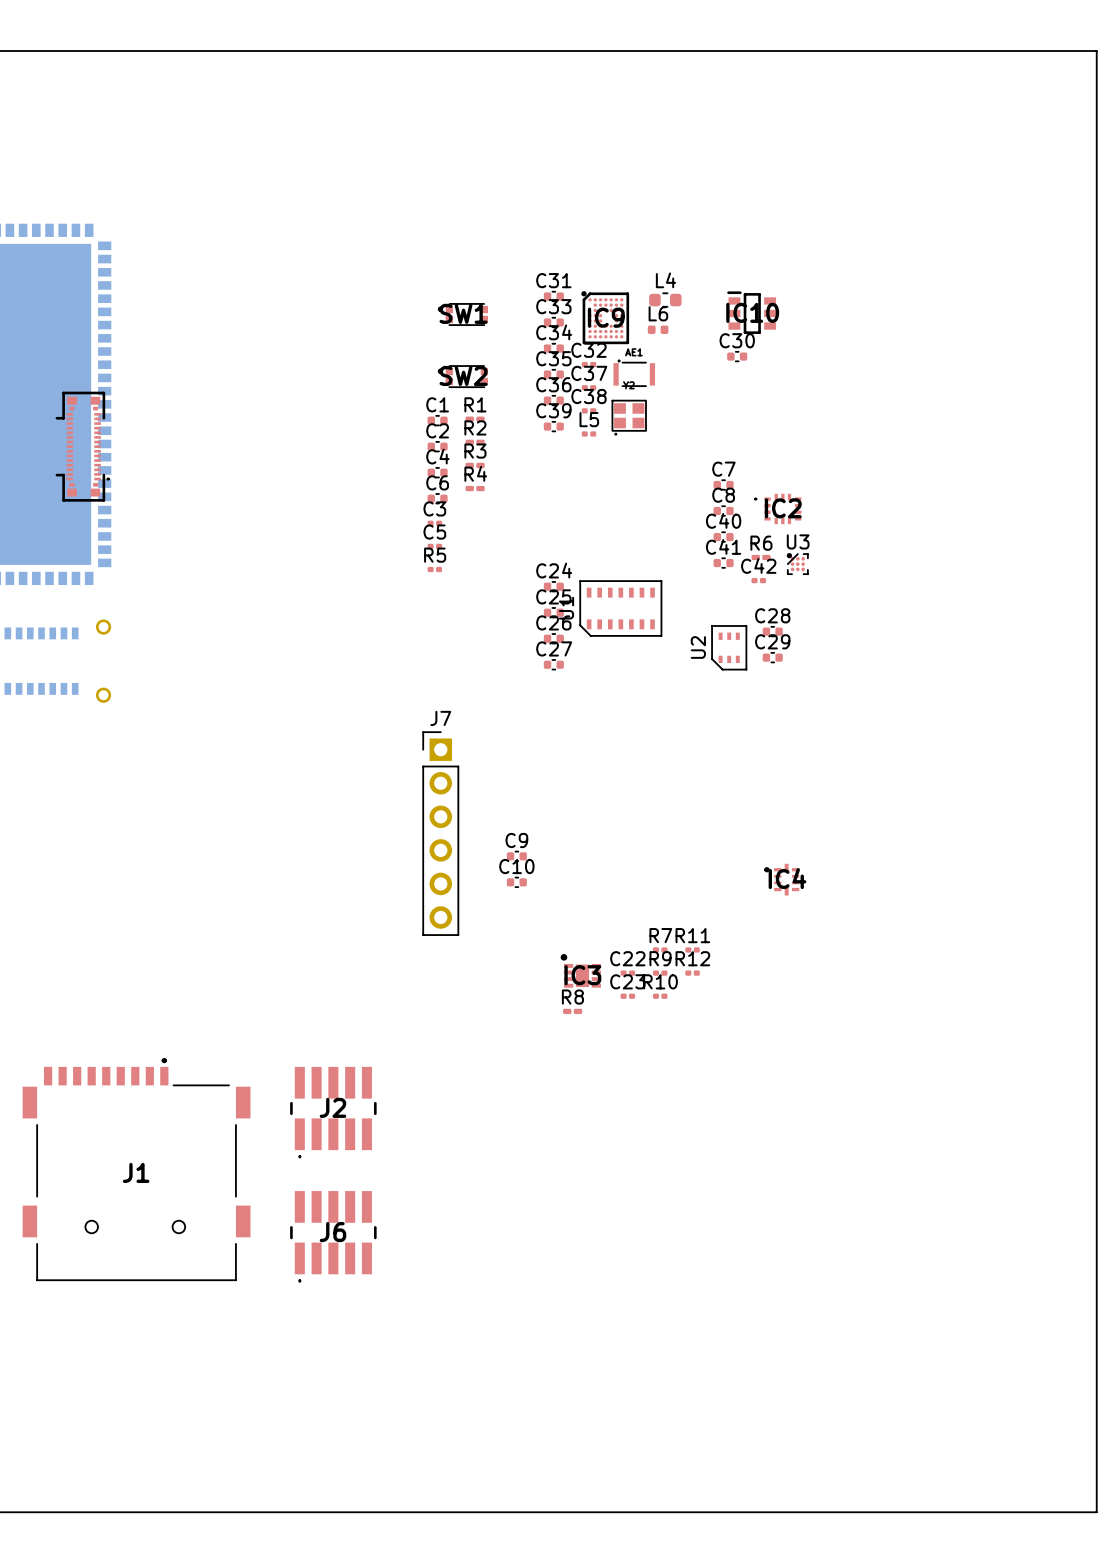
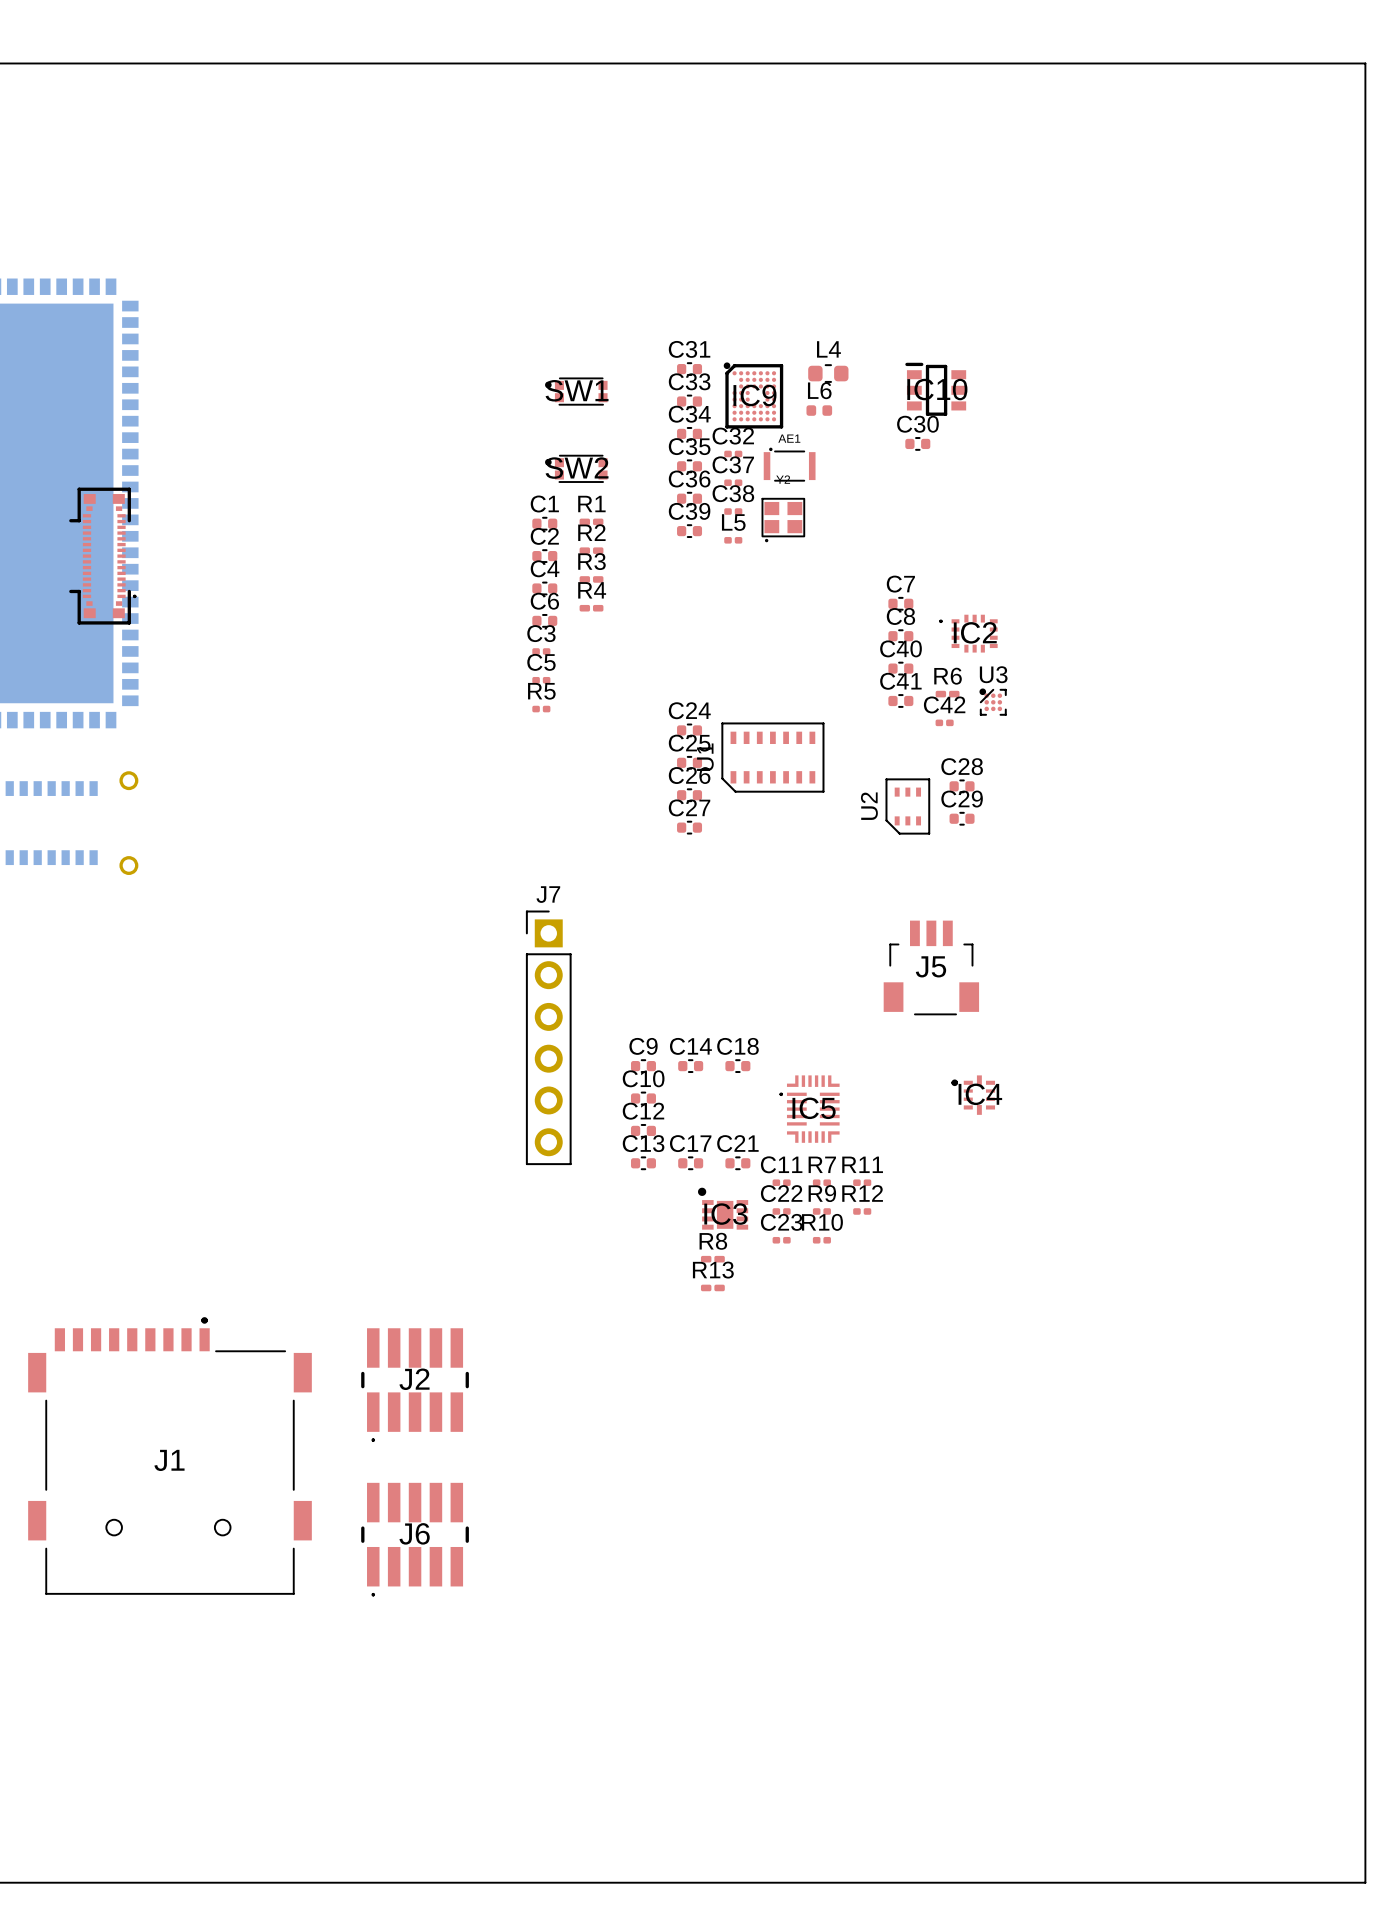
J5: none -> (931, 967)
C14: none -> (690, 1066)
C18: none -> (737, 1066)
IC5: none -> (809, 1109)
C12: none -> (643, 1130)
C13: none -> (643, 1163)
C17: none -> (690, 1163)
C21: none -> (737, 1163)
C11: none -> (781, 1182)
R13: none -> (712, 1287)

